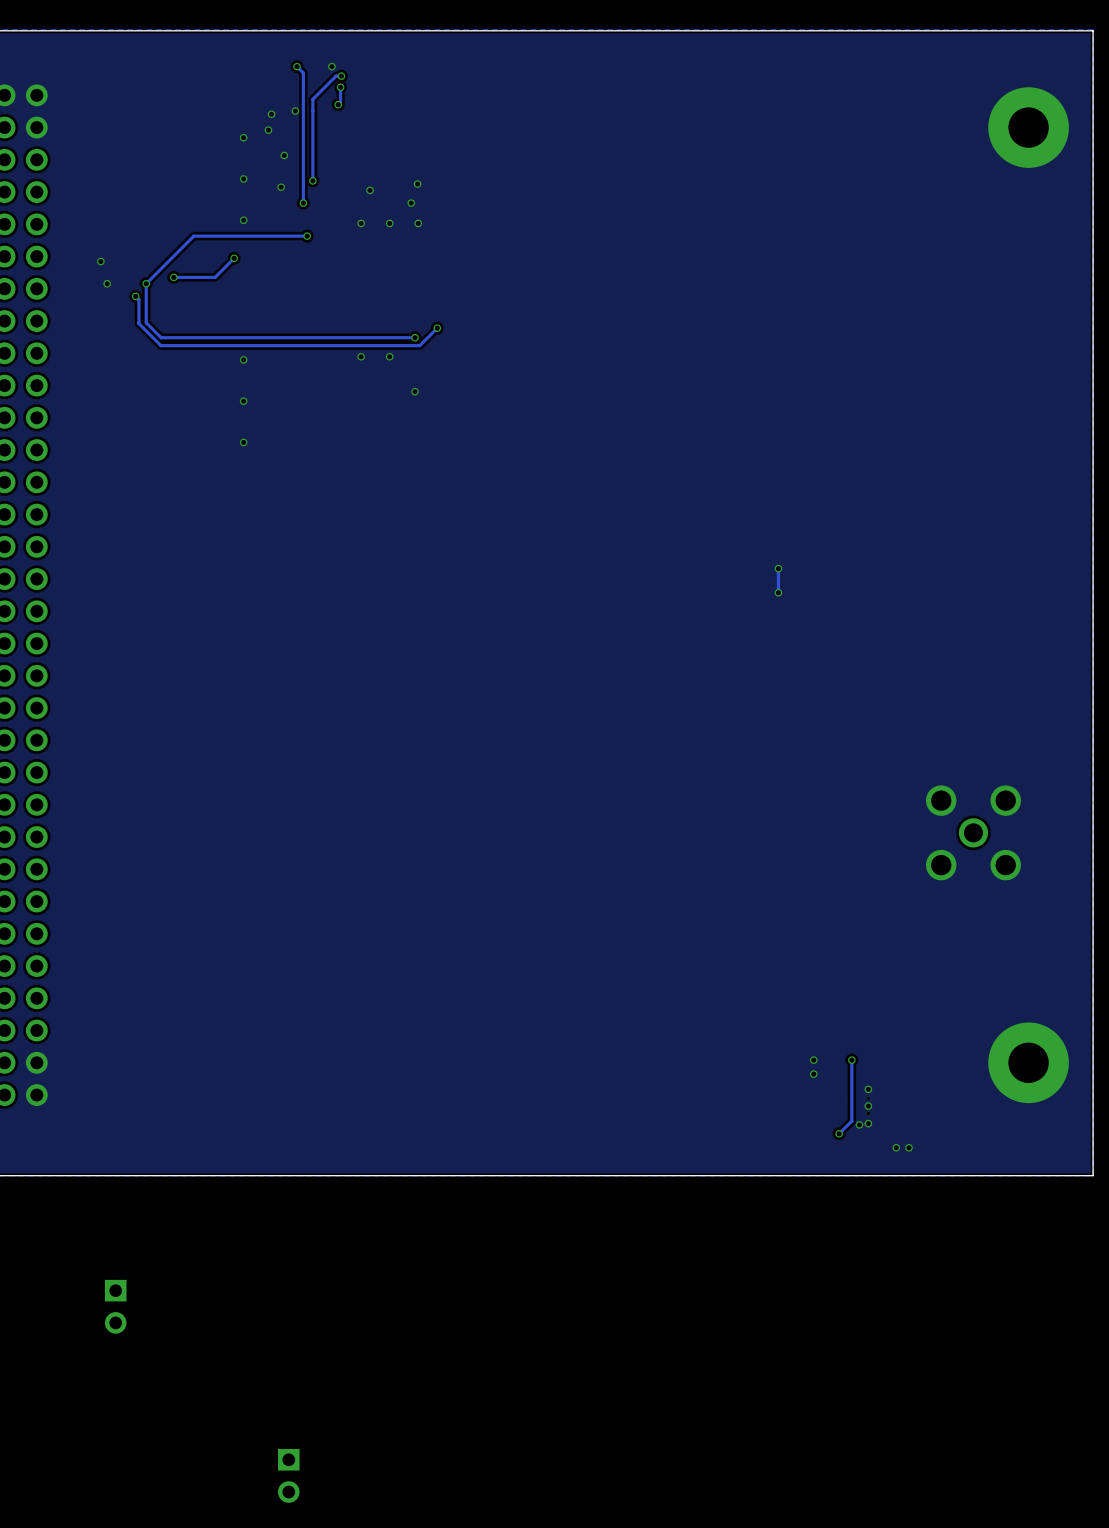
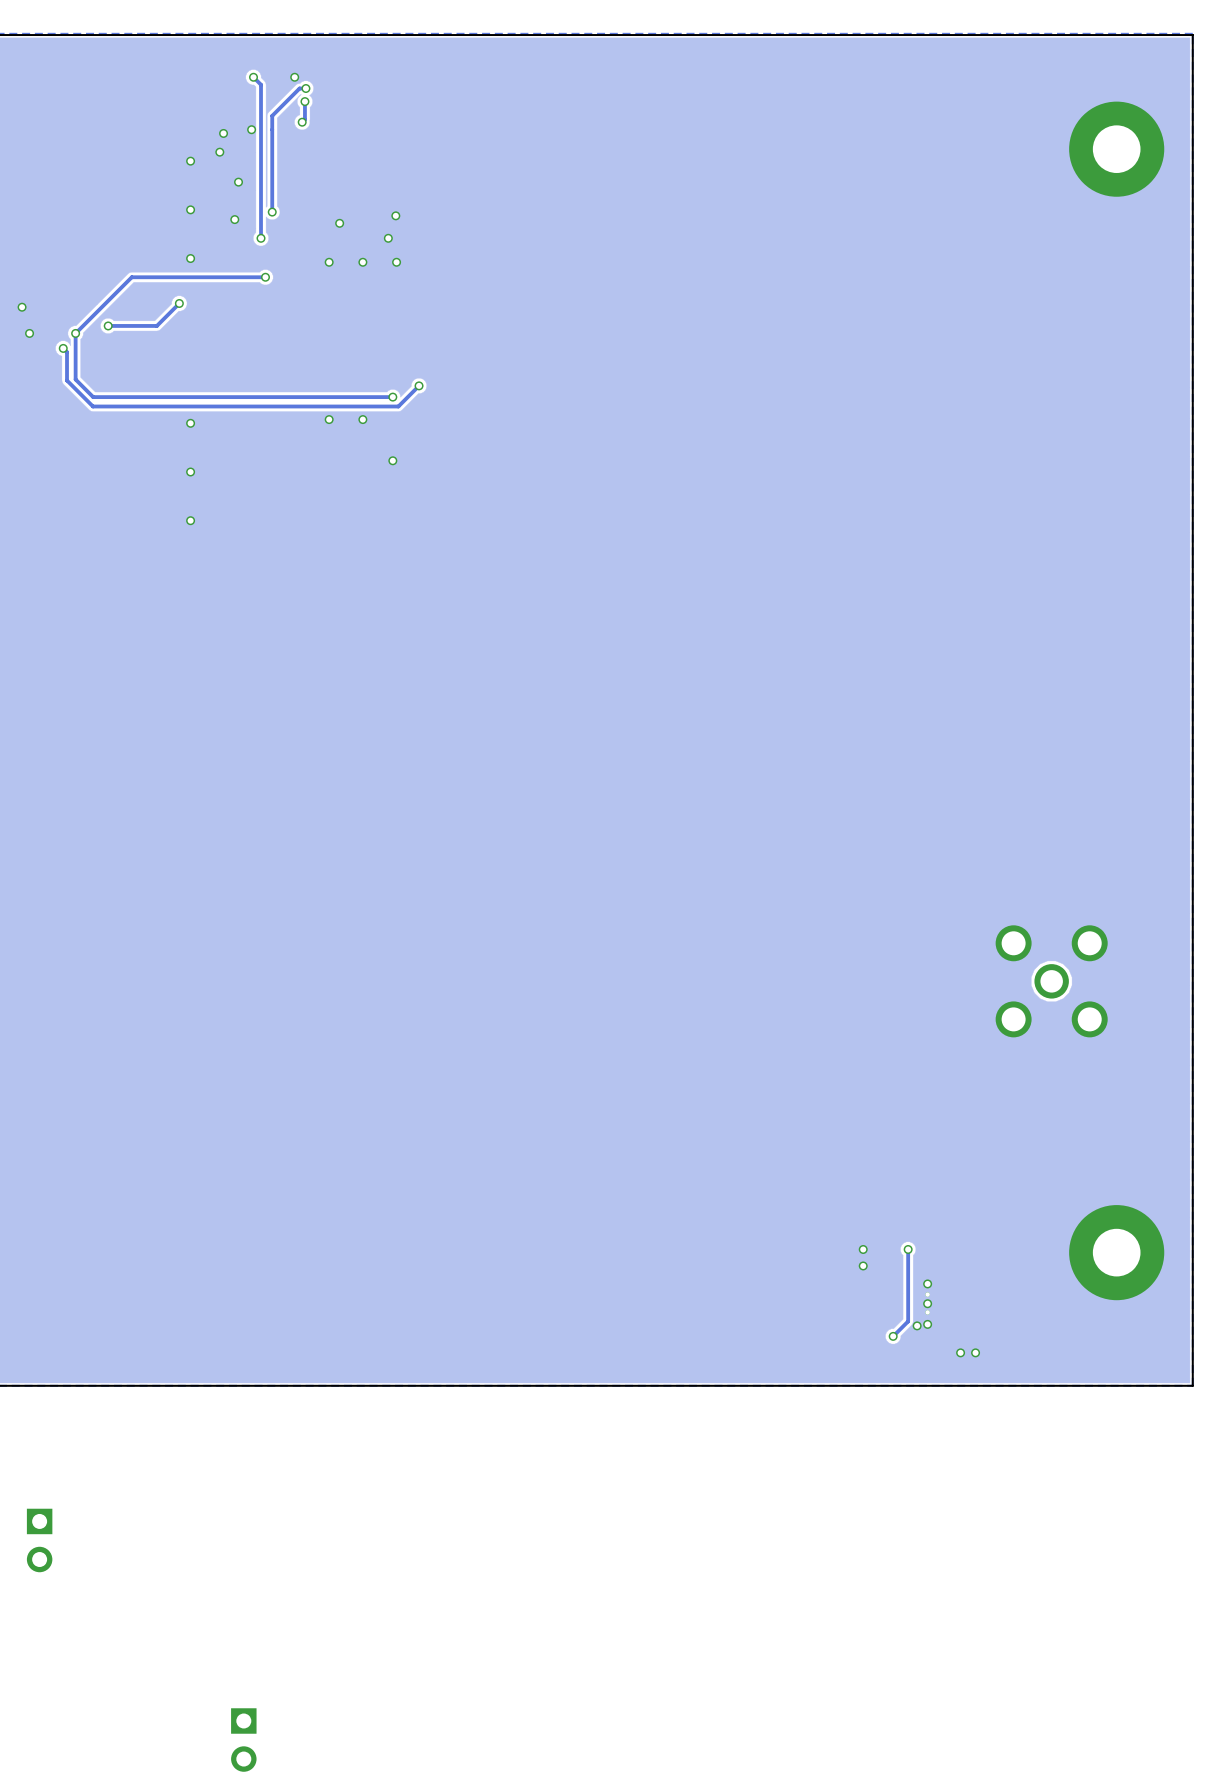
track: (778, 568) (778, 592) -> none
via: (778, 568) -> none
via: (778, 592) -> none

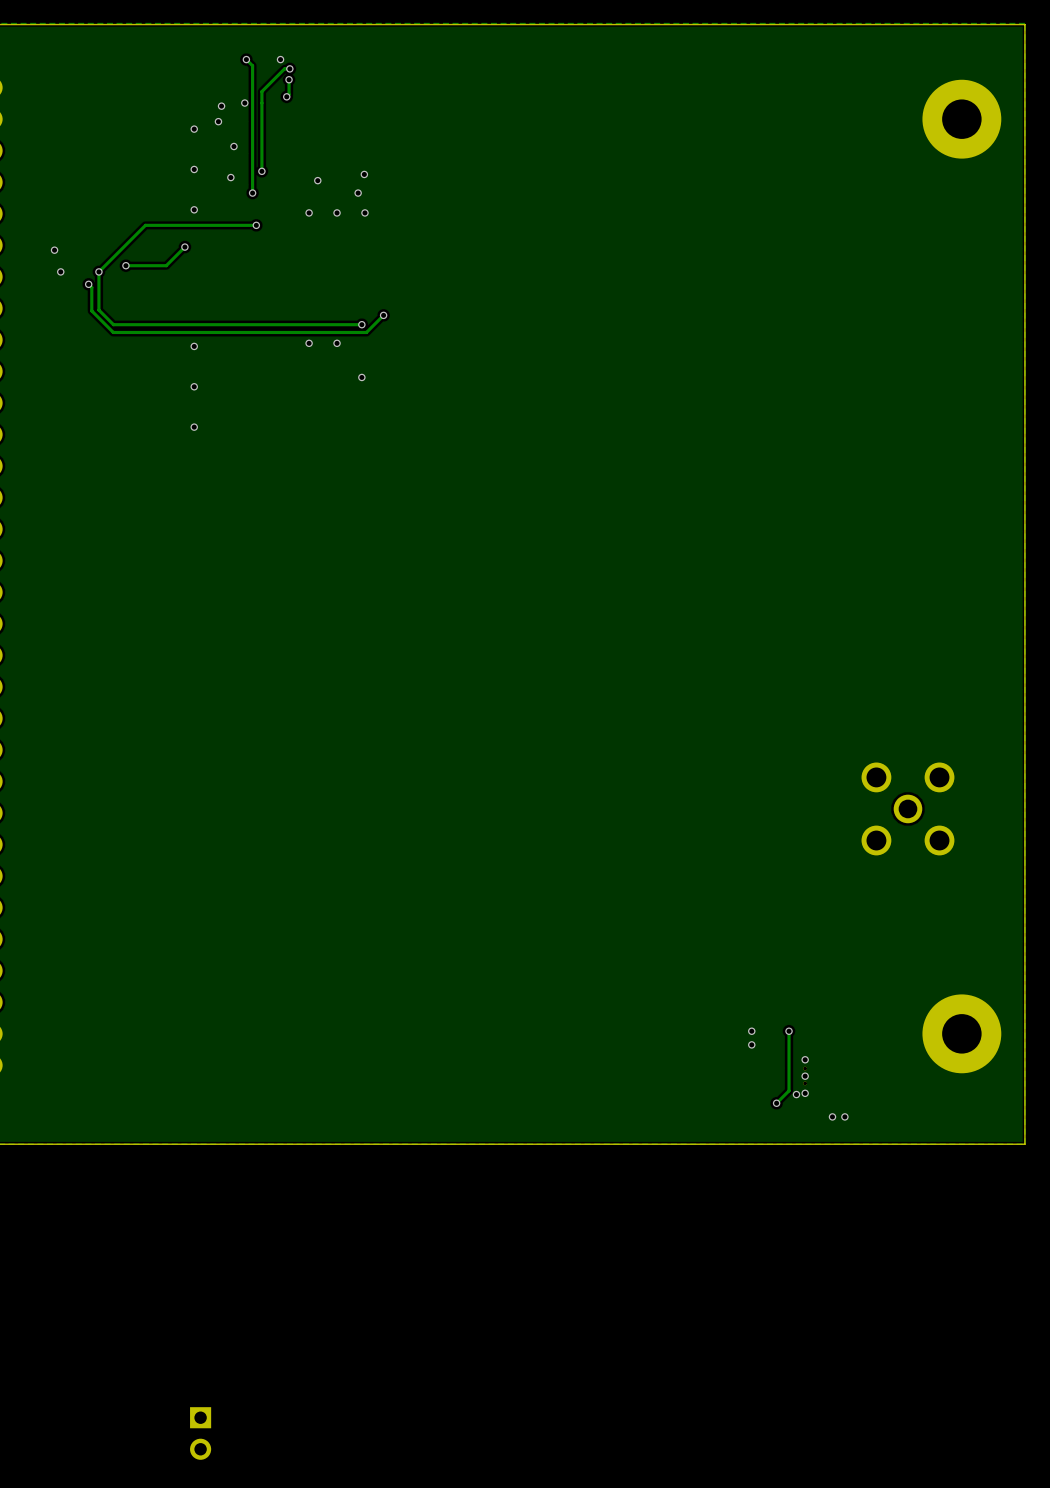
part: (39, 1540) -> none
part position: (243, 1740) -> (200, 1433)

